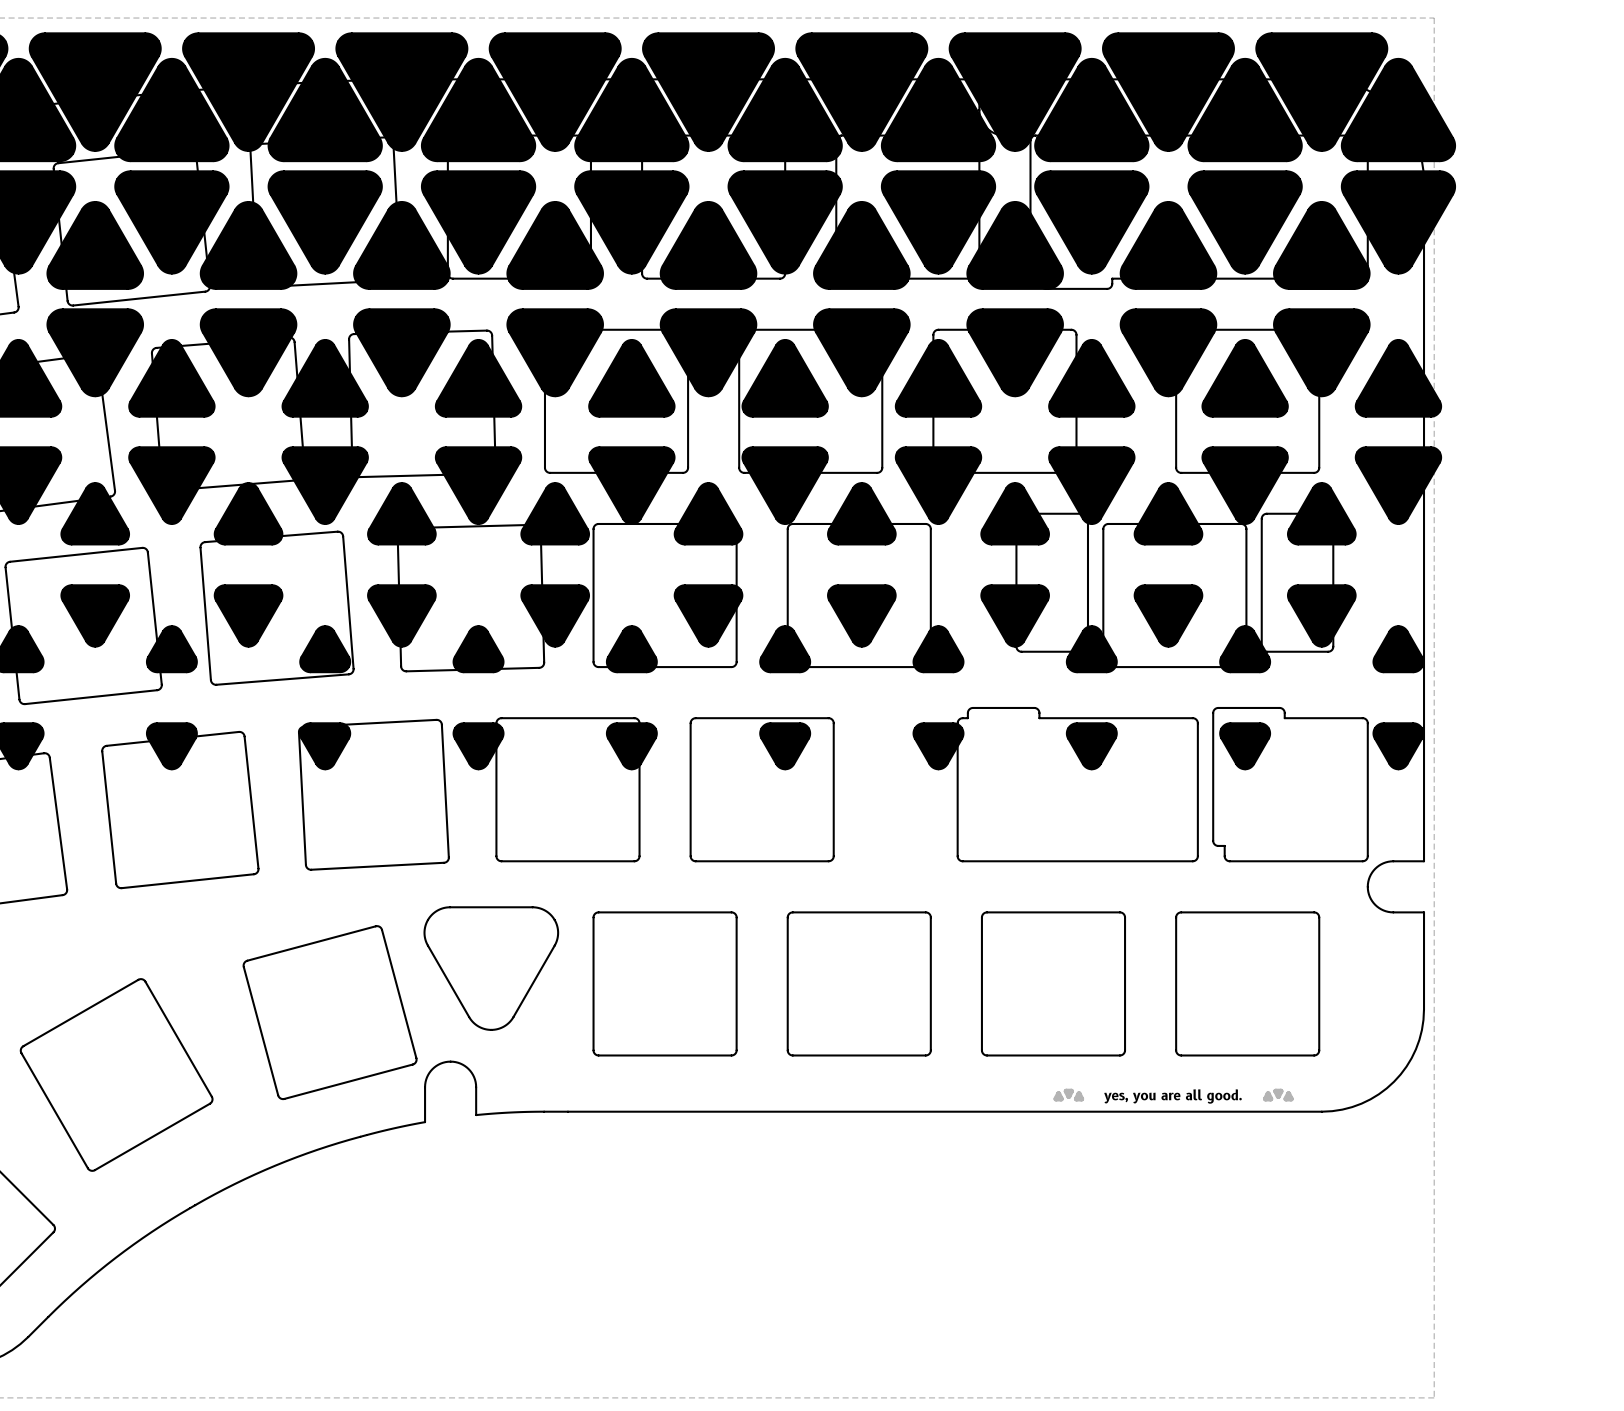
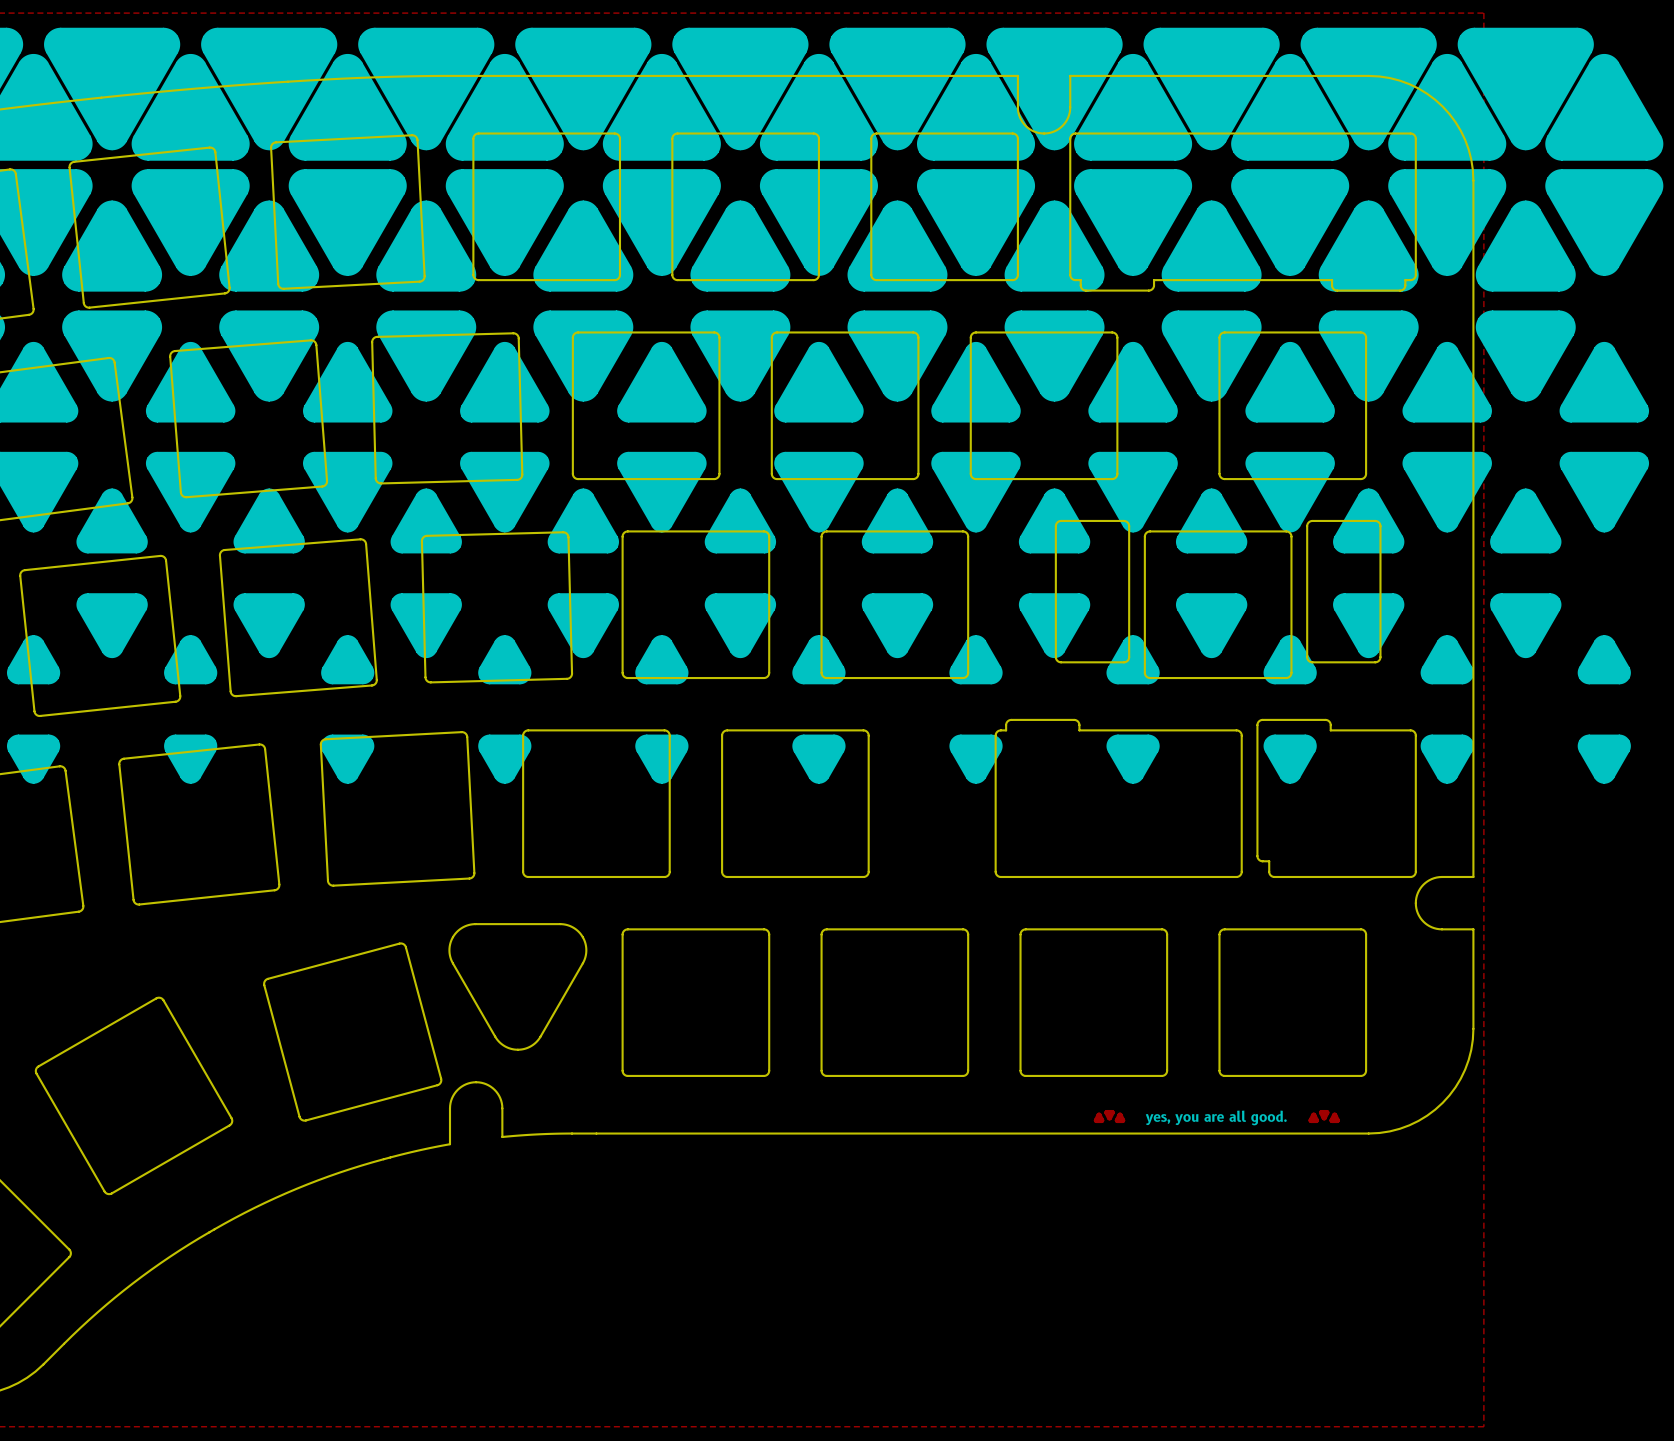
drawing: none -> [1458, 28, 1663, 291]
line: none -> (1474, 28) (1578, 28) (1585, 31) (1591, 37) (1592, 44) (1591, 51) (1539, 141) (1532, 147) (1522, 148) (1513, 143) (1460, 51) (1458, 43) (1461, 35) (1467, 30) (1474, 28)
line: none -> (1604, 54) (1597, 56) (1591, 61) (1547, 137) (1547, 149) (1555, 158) (1562, 159) (1647, 159) (1655, 157) (1660, 150) (1662, 143) (1660, 137) (1617, 62) (1612, 57) (1604, 54)
line: none -> (1562, 170) (1647, 170) (1655, 172) (1660, 178) (1662, 185) (1660, 192) (1617, 266) (1611, 273) (1601, 274) (1591, 268) (1547, 192) (1546, 184) (1548, 177) (1555, 171) (1562, 170)
line: none -> (1525, 201) (1518, 203) (1512, 208) (1478, 268) (1478, 280) (1486, 289) (1560, 290) (1568, 287) (1573, 280) (1573, 267) (1539, 209) (1533, 203) (1525, 201)
drawing: none -> [1476, 311, 1648, 422]
line: none -> (1492, 311) (1561, 311) (1568, 314) (1573, 321) (1574, 328) (1572, 335) (1538, 393) (1531, 399) (1521, 399) (1513, 394) (1478, 333) (1476, 325) (1479, 318) (1485, 313) (1492, 311)
line: none -> (1604, 342) (1595, 347) (1561, 406) (1561, 414) (1566, 420) (1638, 421) (1646, 415) (1646, 406) (1613, 348) (1604, 342)
drawing: none -> [1491, 452, 1648, 553]
line: none -> (1571, 452) (1638, 452) (1646, 458) (1646, 467) (1613, 526) (1608, 530) (1602, 531) (1596, 527) (1561, 467) (1562, 457) (1571, 452)
line: none -> (1525, 489) (1517, 494) (1492, 537) (1491, 545) (1496, 551) (1550, 552) (1559, 546) (1559, 537) (1534, 494) (1525, 489)
drawing: none -> [1491, 594, 1561, 658]
line: none -> (1501, 594) (1551, 594) (1559, 600) (1559, 609) (1534, 651) (1530, 655) (1523, 656) (1517, 652) (1492, 609) (1492, 598) (1501, 594)
drawing: none -> [1578, 636, 1630, 684]
line: none -> (1604, 636) (1596, 640) (1579, 668) (1579, 676) (1585, 682) (1620, 683) (1629, 676) (1629, 668) (1613, 641) (1604, 636)
drawing: none -> [1578, 735, 1630, 783]
line: none -> (1589, 735) (1620, 735) (1629, 742) (1628, 750) (1613, 778) (1608, 781) (1602, 782) (1596, 779) (1579, 750) (1580, 740) (1589, 735)

